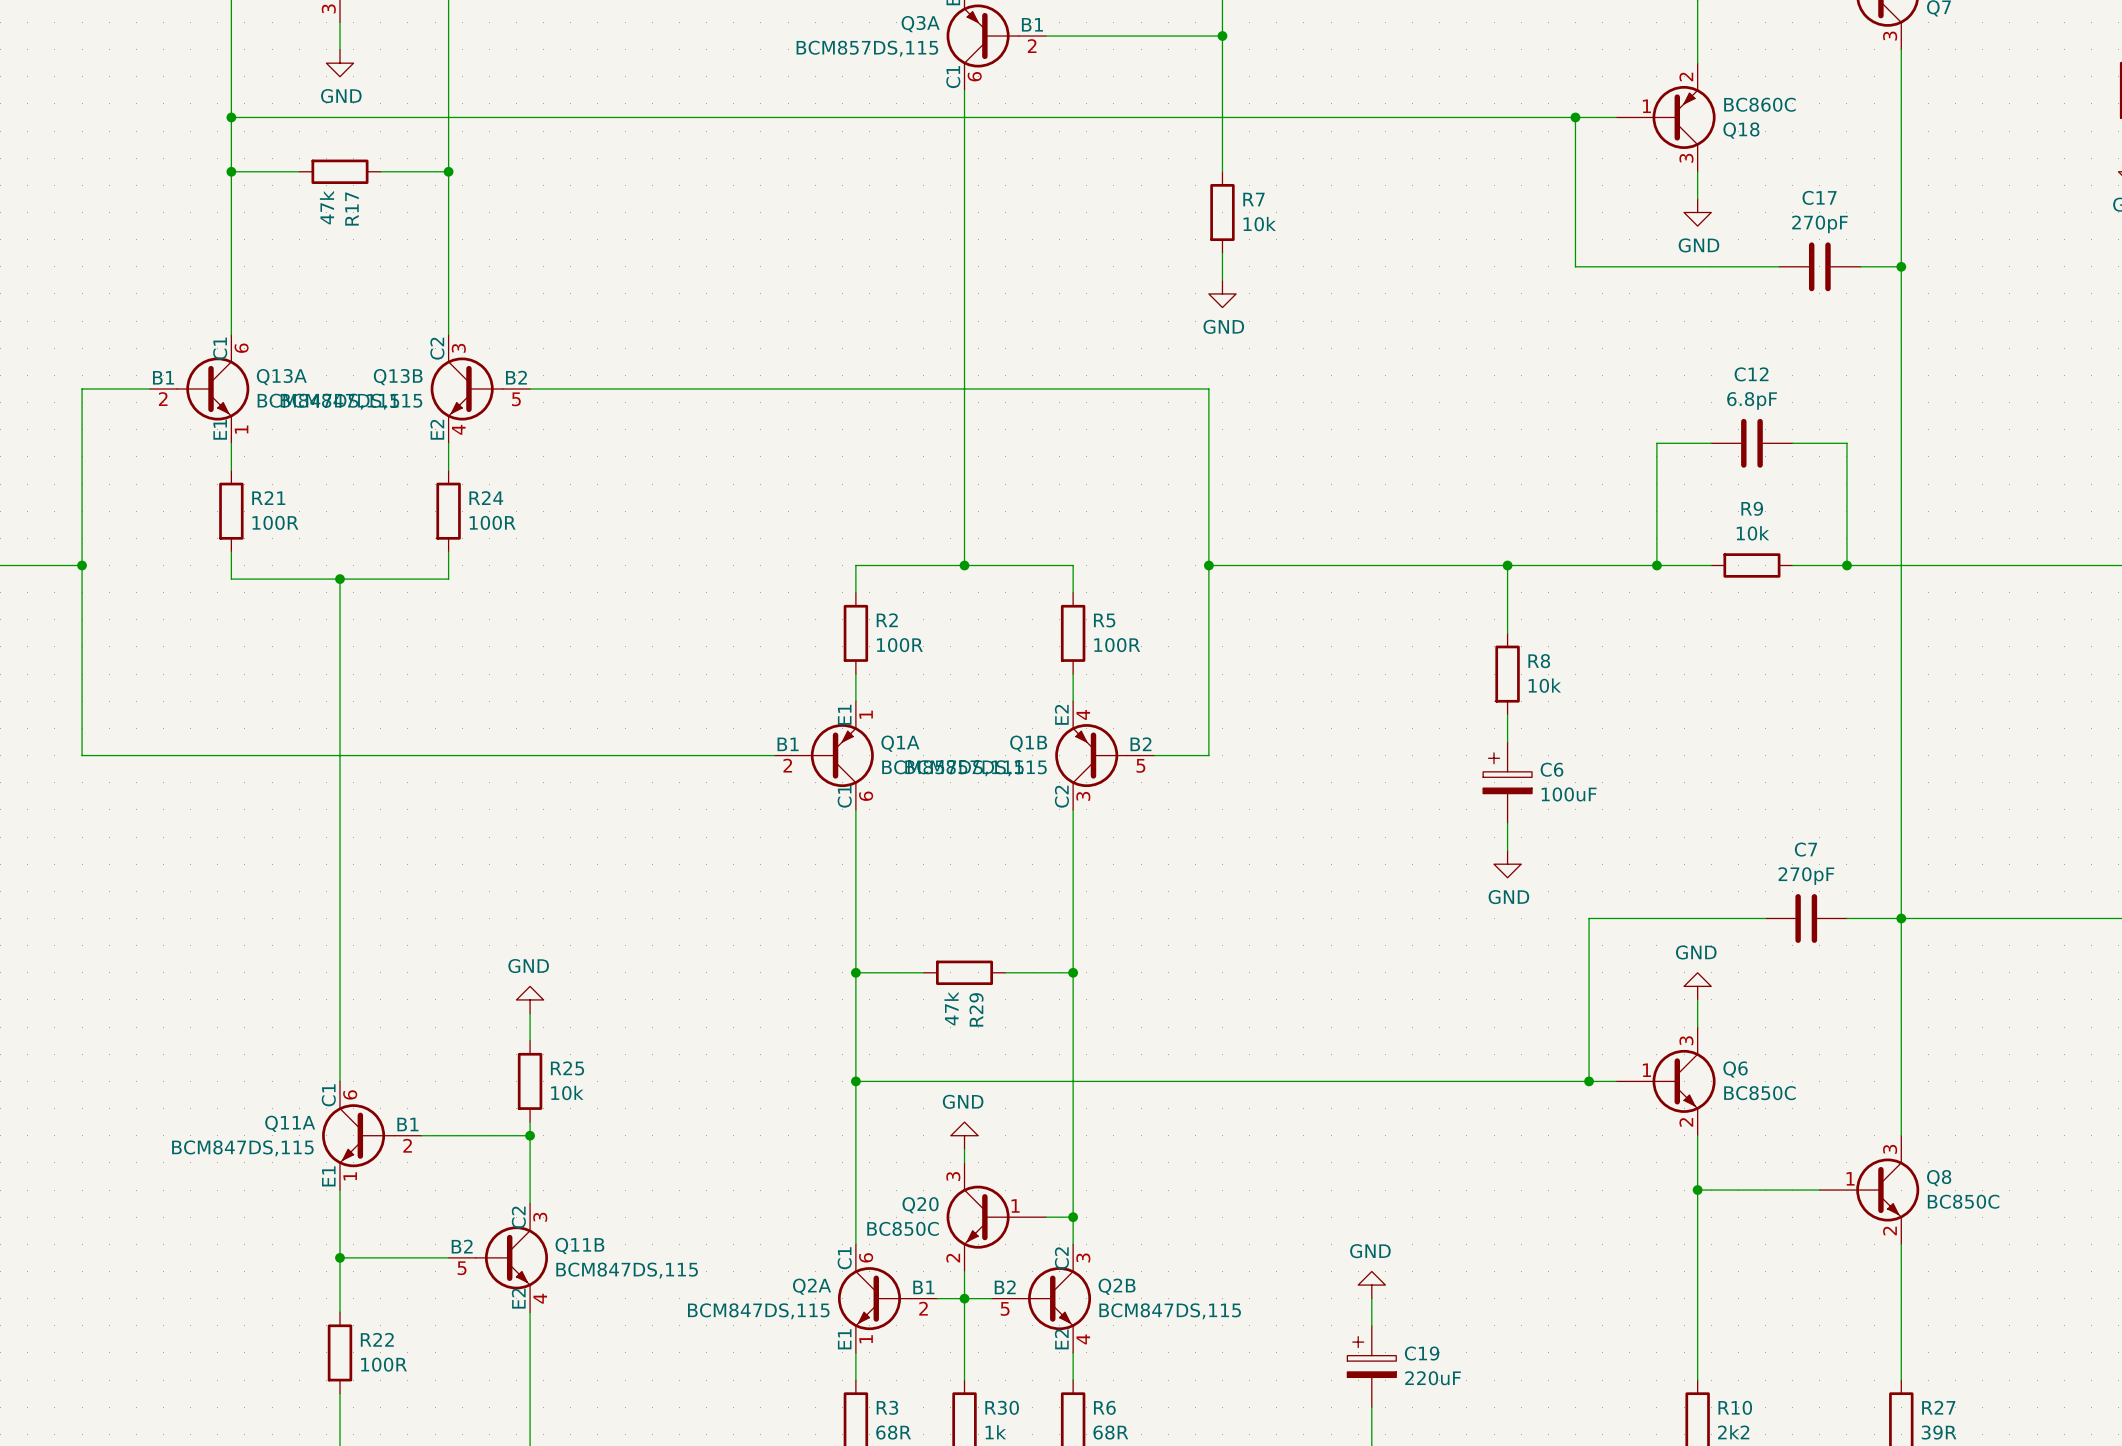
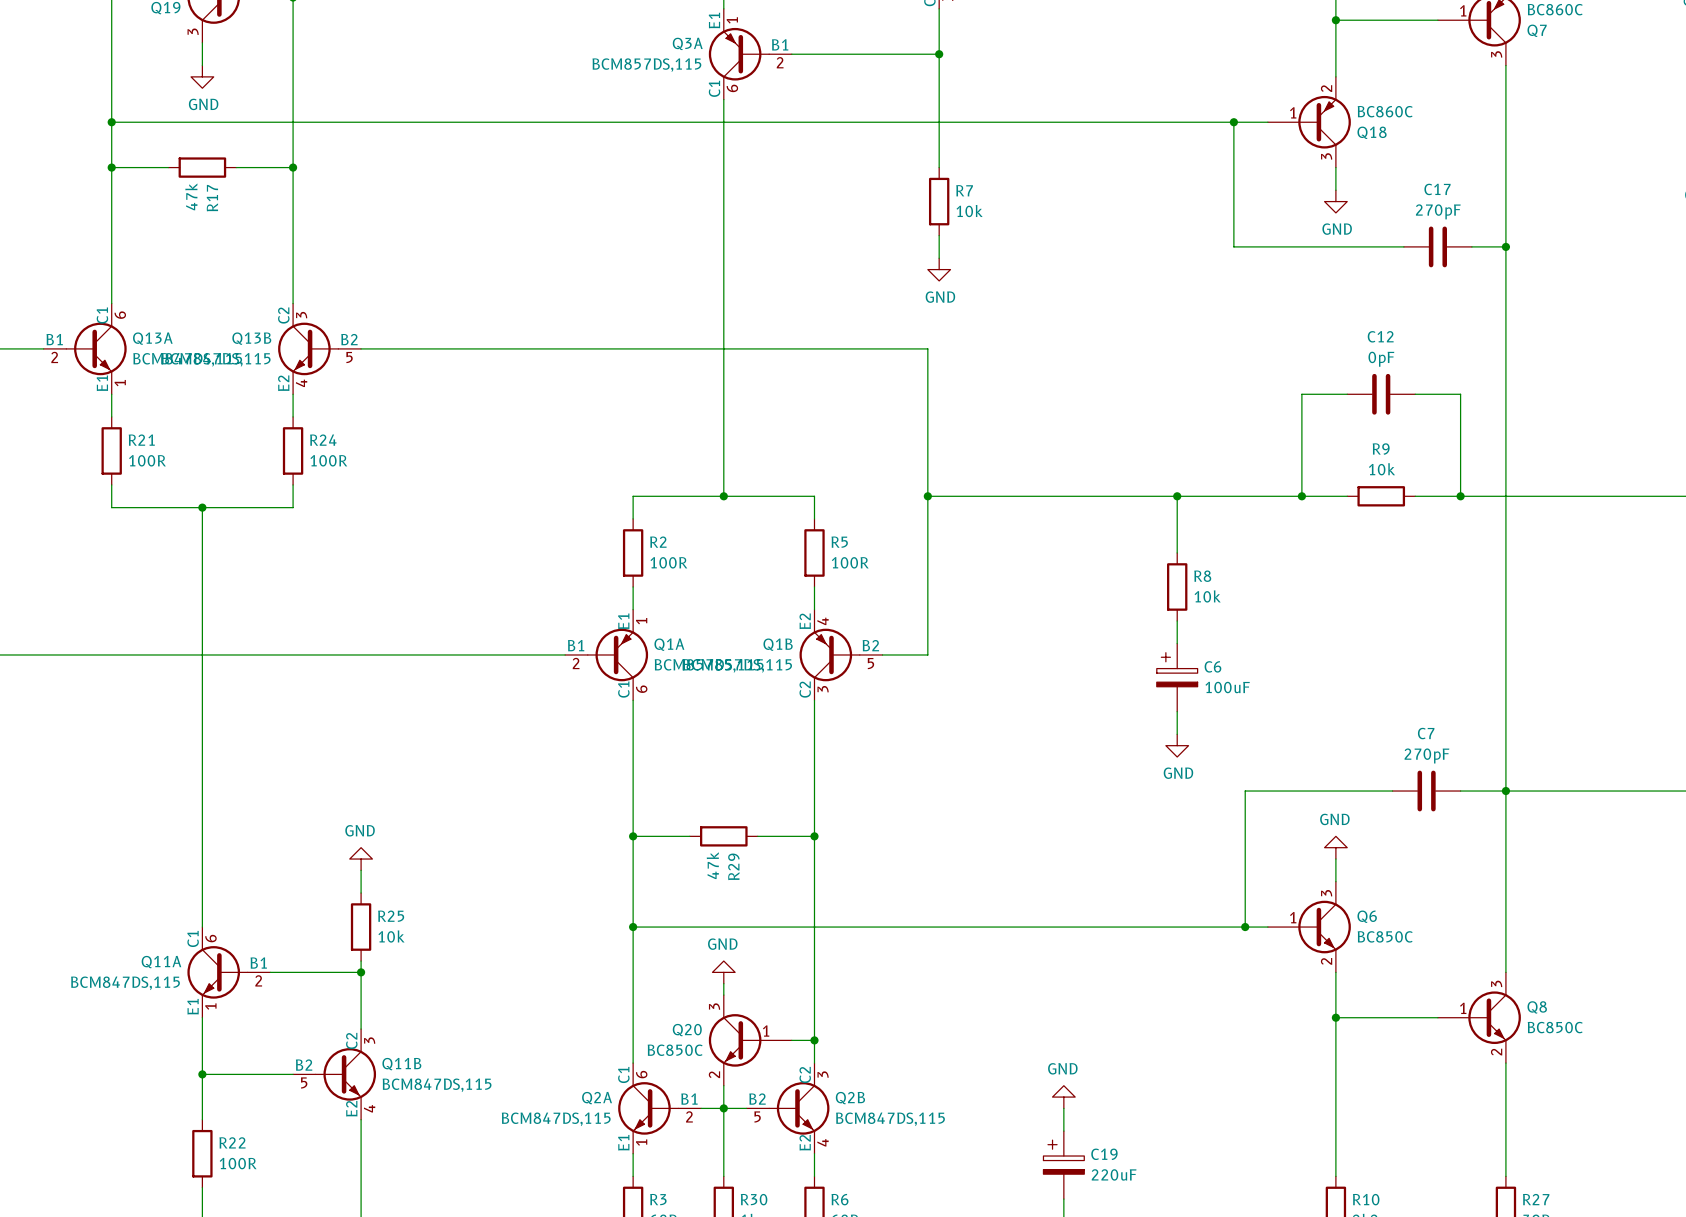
C12 value: 6.8pF (1752, 400) -> 0pF (1381, 359)

